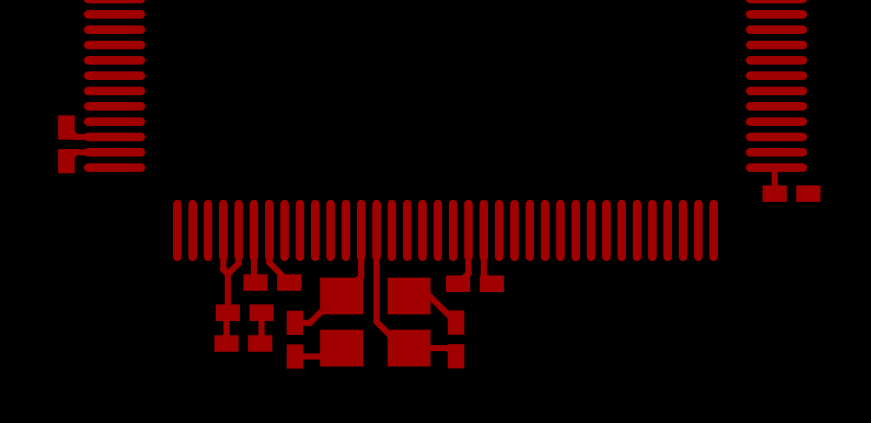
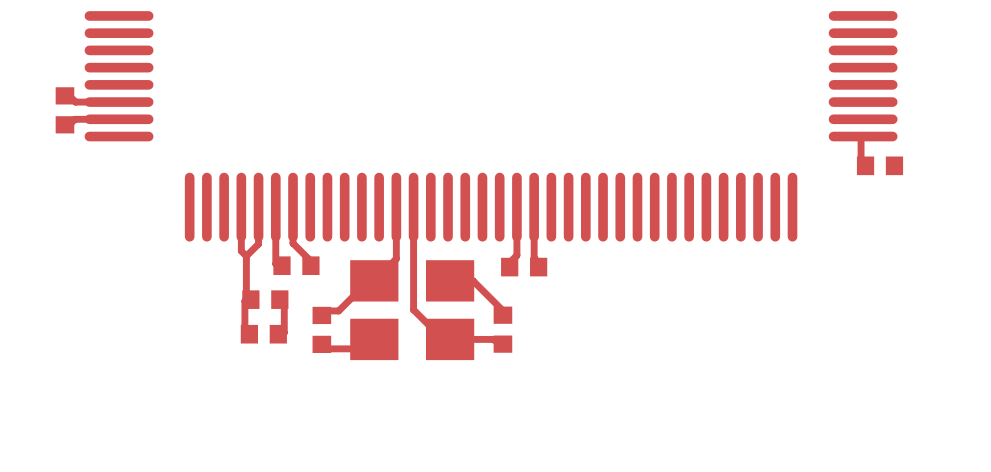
part footprint: [58, 115, 75, 174] -> [55, 87, 75, 134]
part footprint: [762, 185, 821, 202] -> [856, 156, 904, 176]
part footprint: [243, 274, 302, 291] -> [273, 256, 320, 276]
part footprint: [445, 275, 504, 293] -> [501, 257, 548, 277]
part footprint: [215, 304, 274, 322] -> [242, 290, 289, 309]
part footprint: [286, 310, 304, 369] -> [312, 306, 332, 353]
part footprint: [447, 310, 465, 369] -> [493, 306, 513, 353]
part footprint: [214, 335, 273, 352] -> [240, 324, 287, 344]

